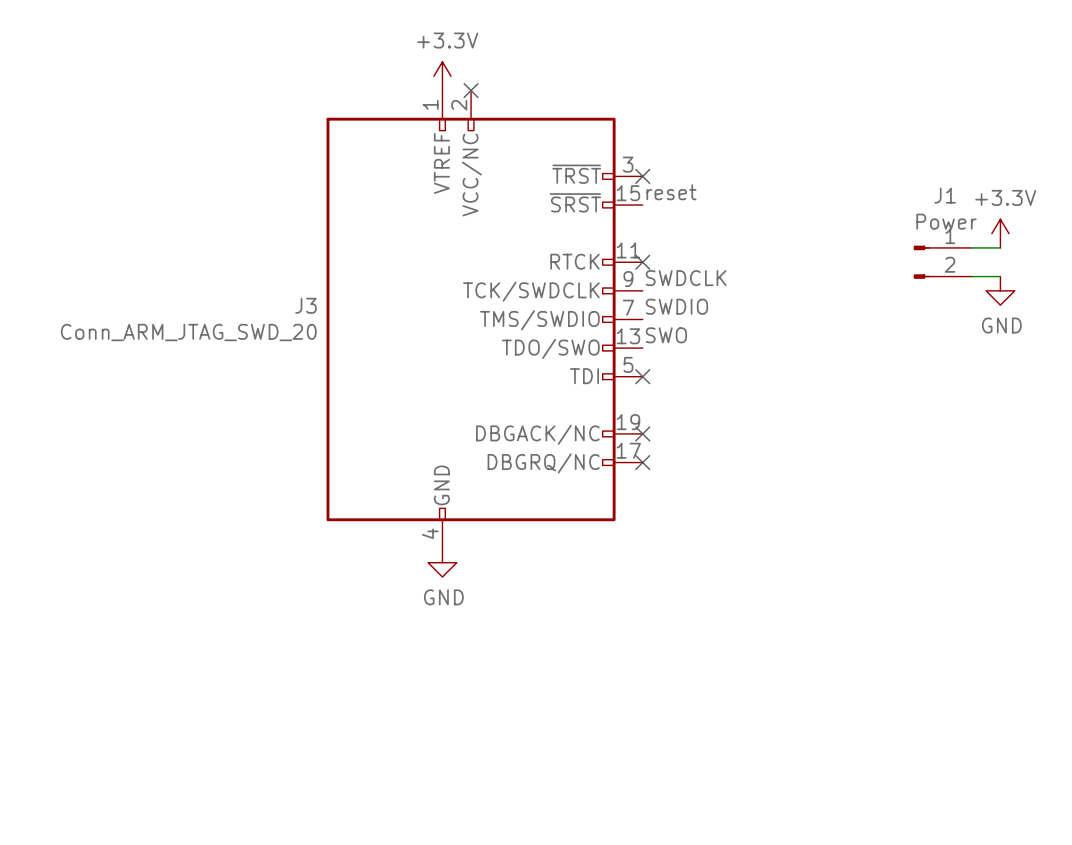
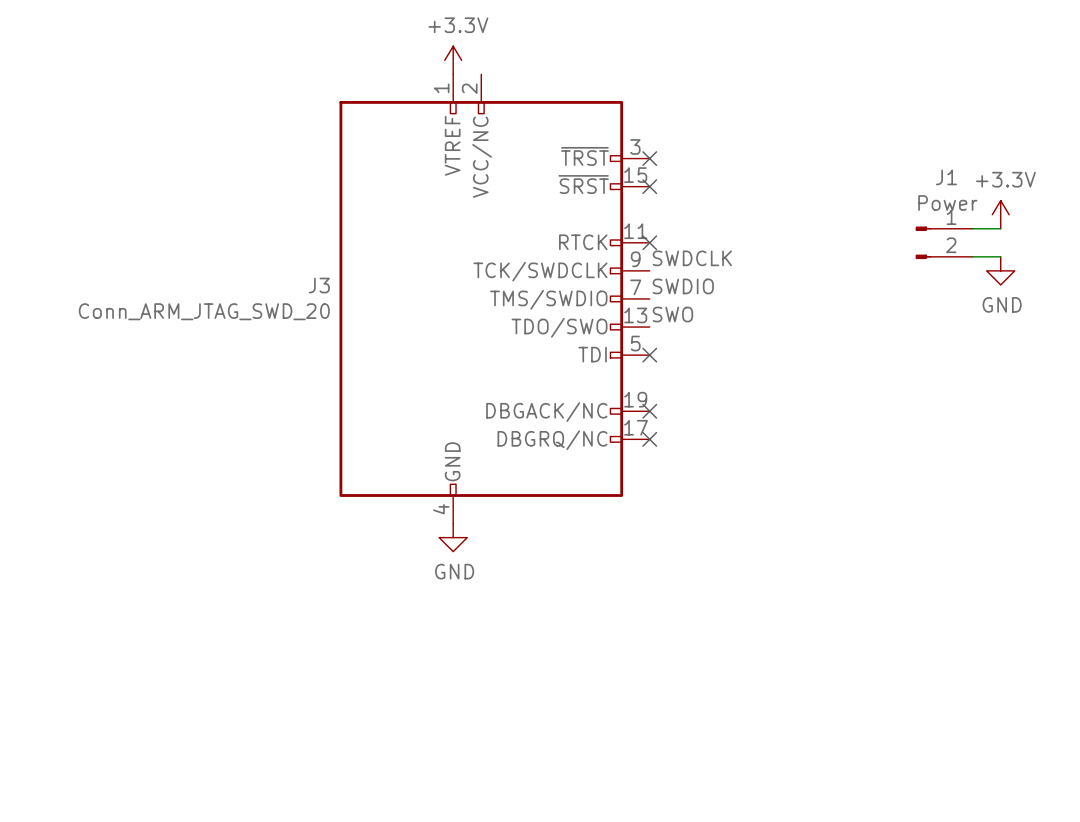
no-connect mark: (471, 90) -> none
label: reset (671, 192) -> none
no-connect mark: none -> (649, 186)

